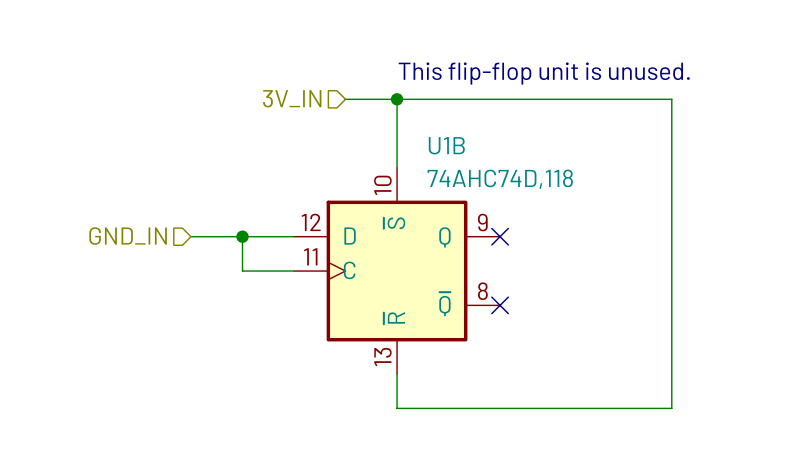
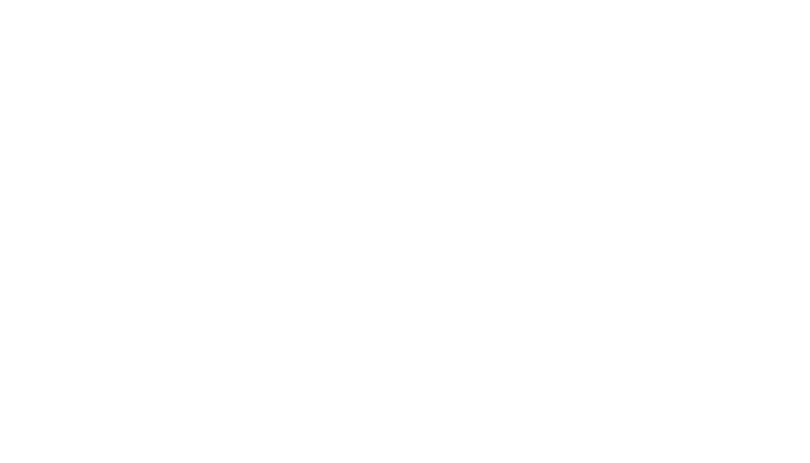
text: This flip-flop unit is unused. (544, 73) -> none
hierarchical label: 3V_IN (292, 98) -> none
wire: (345, 99) (671, 99) (671, 408) (397, 408) (397, 374) -> none
wire: (397, 99) (397, 168) -> none
junction: (397, 99) -> none
hierarchical label: GND_IN (128, 236) -> none
wire: (190, 236) (294, 236) -> none
wire: (242, 236) (242, 271) (294, 271) -> none
junction: (242, 236) -> none
no-connect mark: (500, 236) -> none
U1B: 74AHC74D,118 (397, 271) -> none
no-connect mark: (500, 305) -> none

